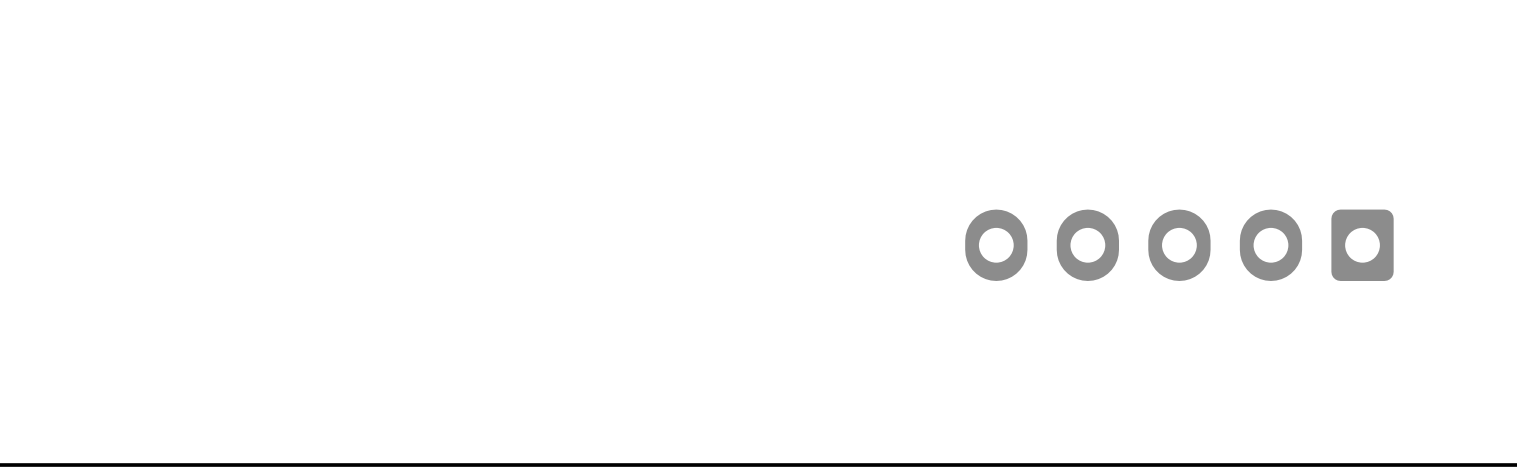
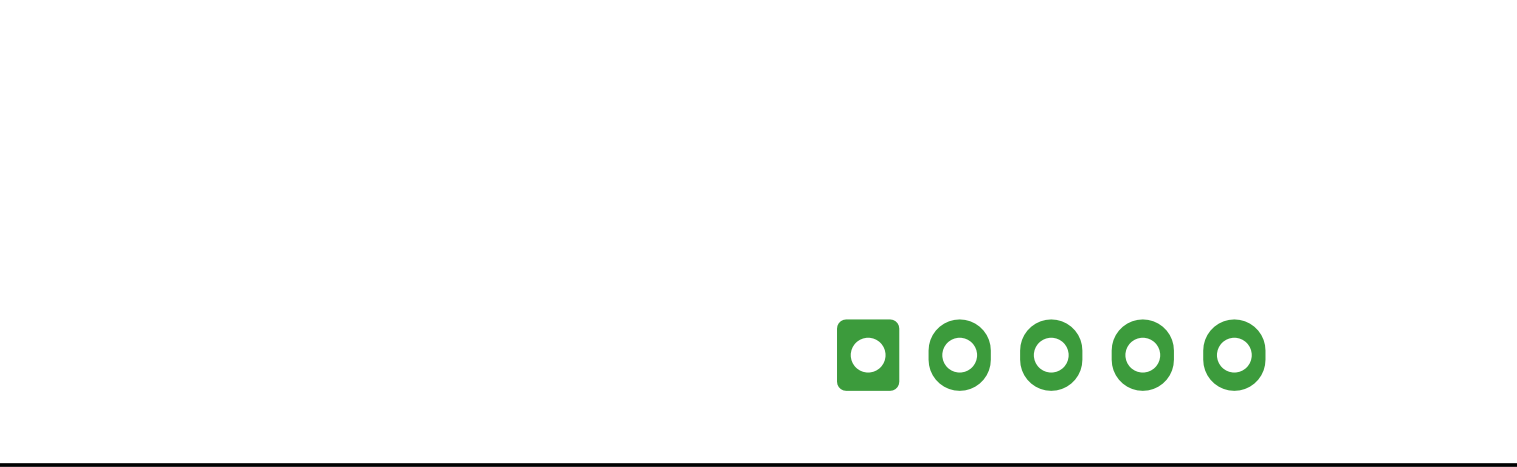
part rotation: 0° (1179, 245) -> 180° (1051, 355)

